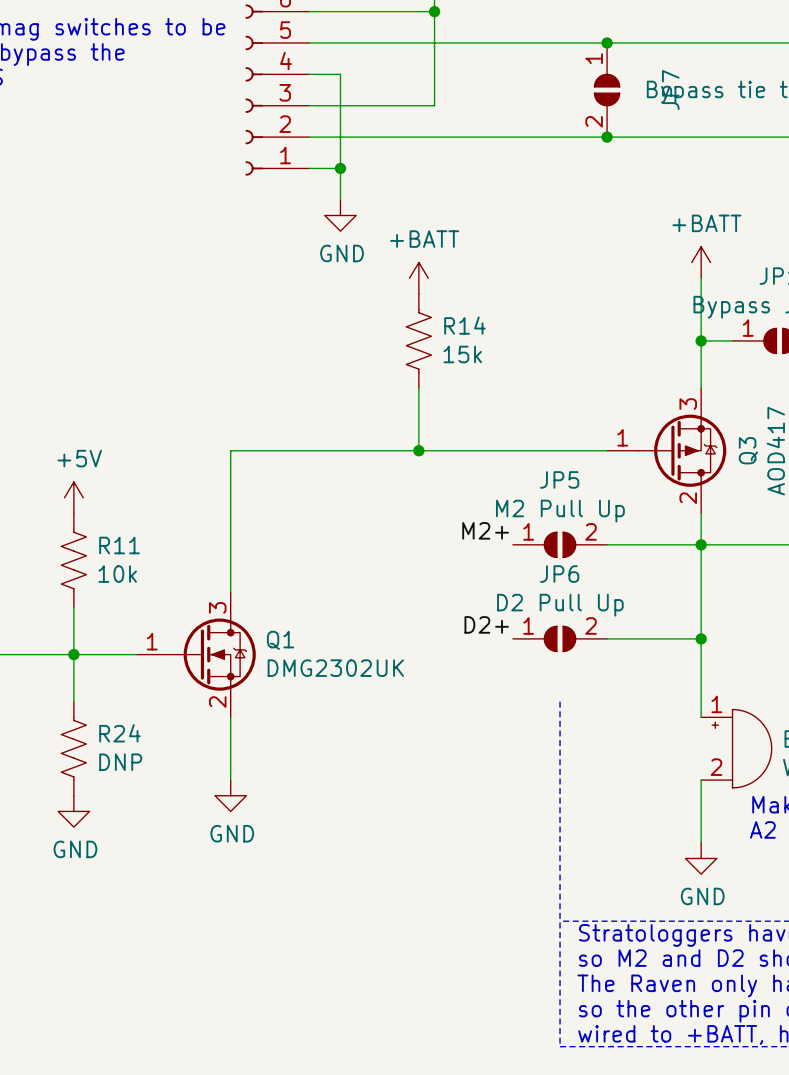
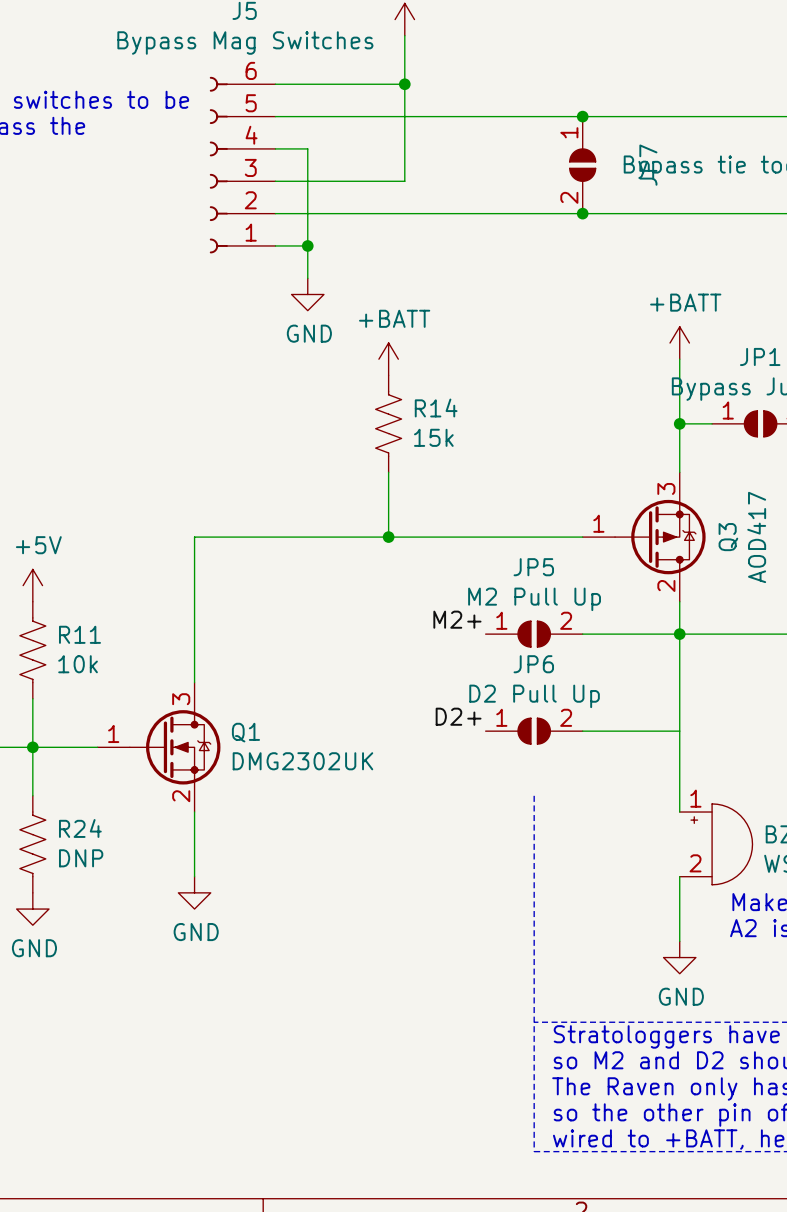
junction: (701, 638) -> none

